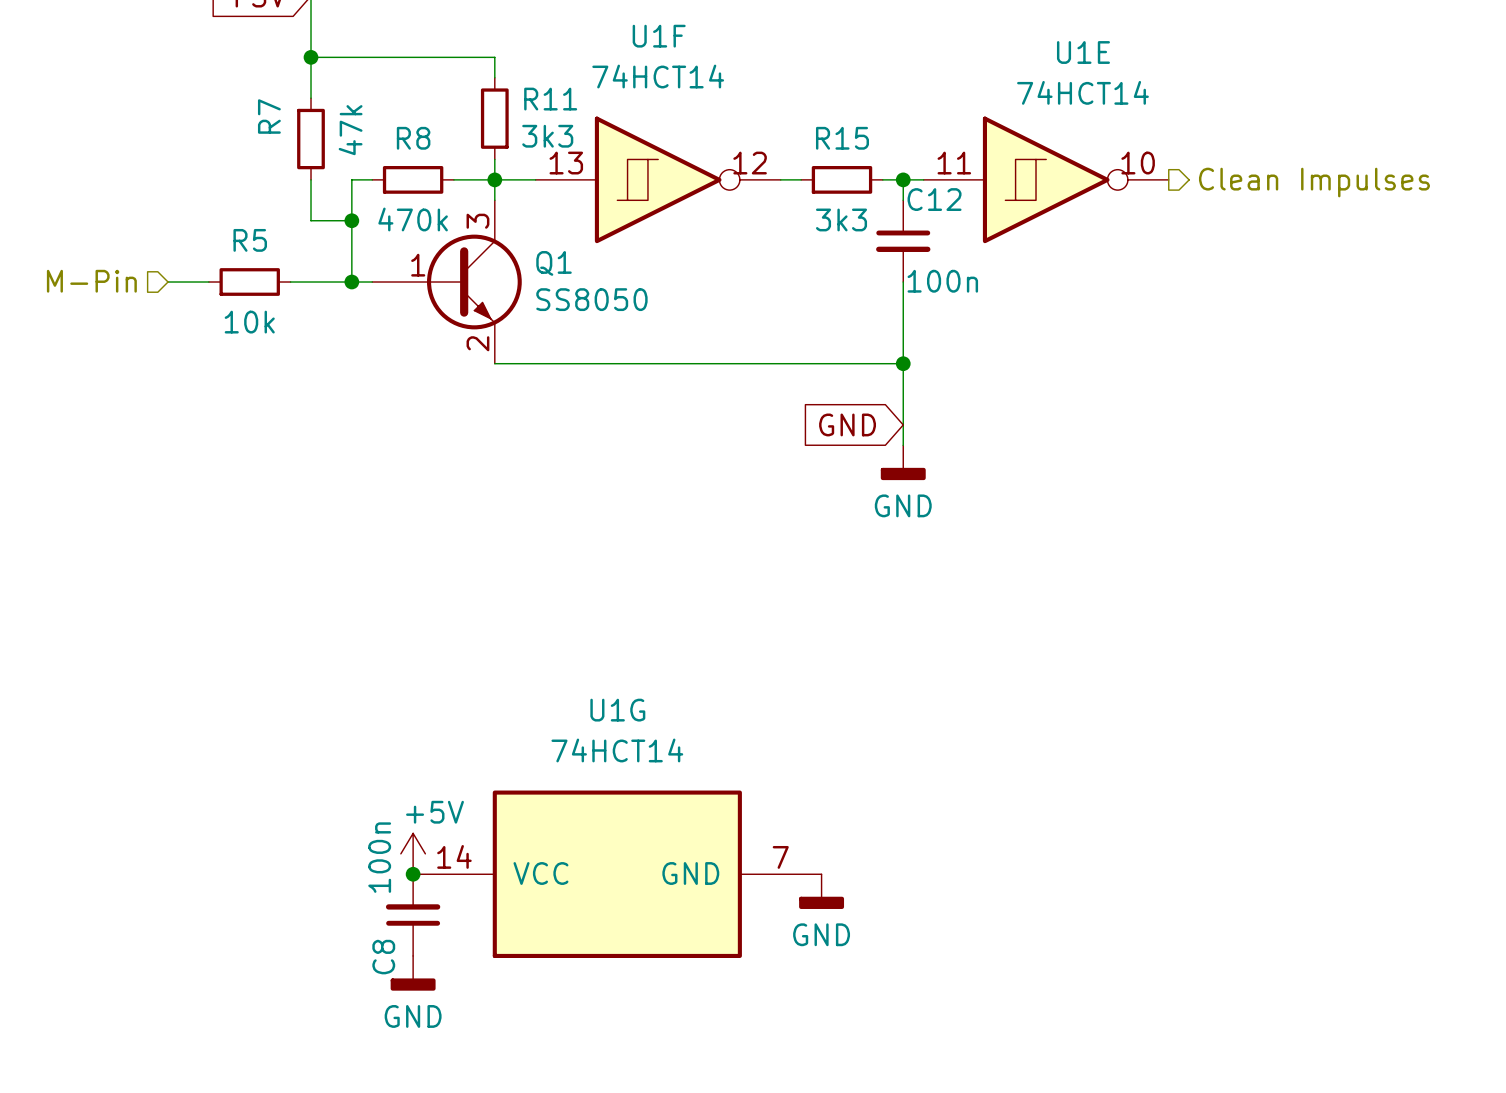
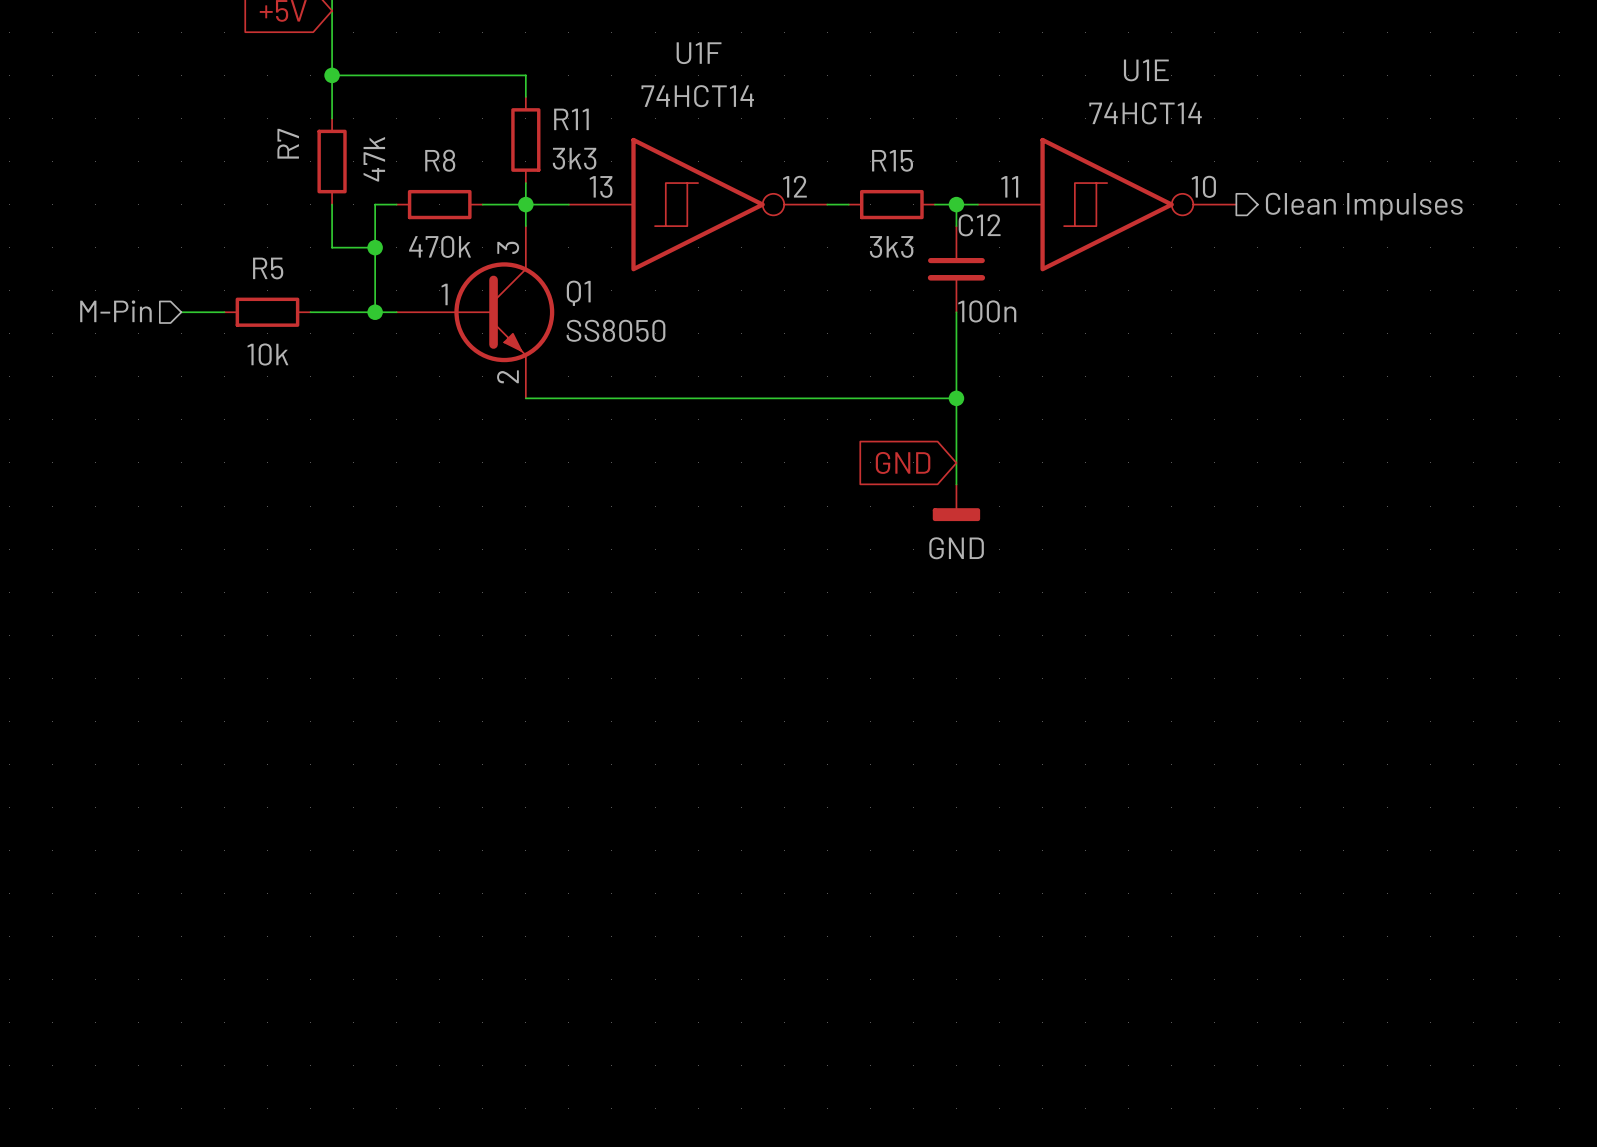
power symbol: +5V (413, 853) -> none
junction: (413, 874) -> none
U1G: 74HCT14 (617, 874) -> none
power symbol: GND (821, 891) -> none
C8: 100n (413, 915) -> none
power symbol: GND (413, 973) -> none

